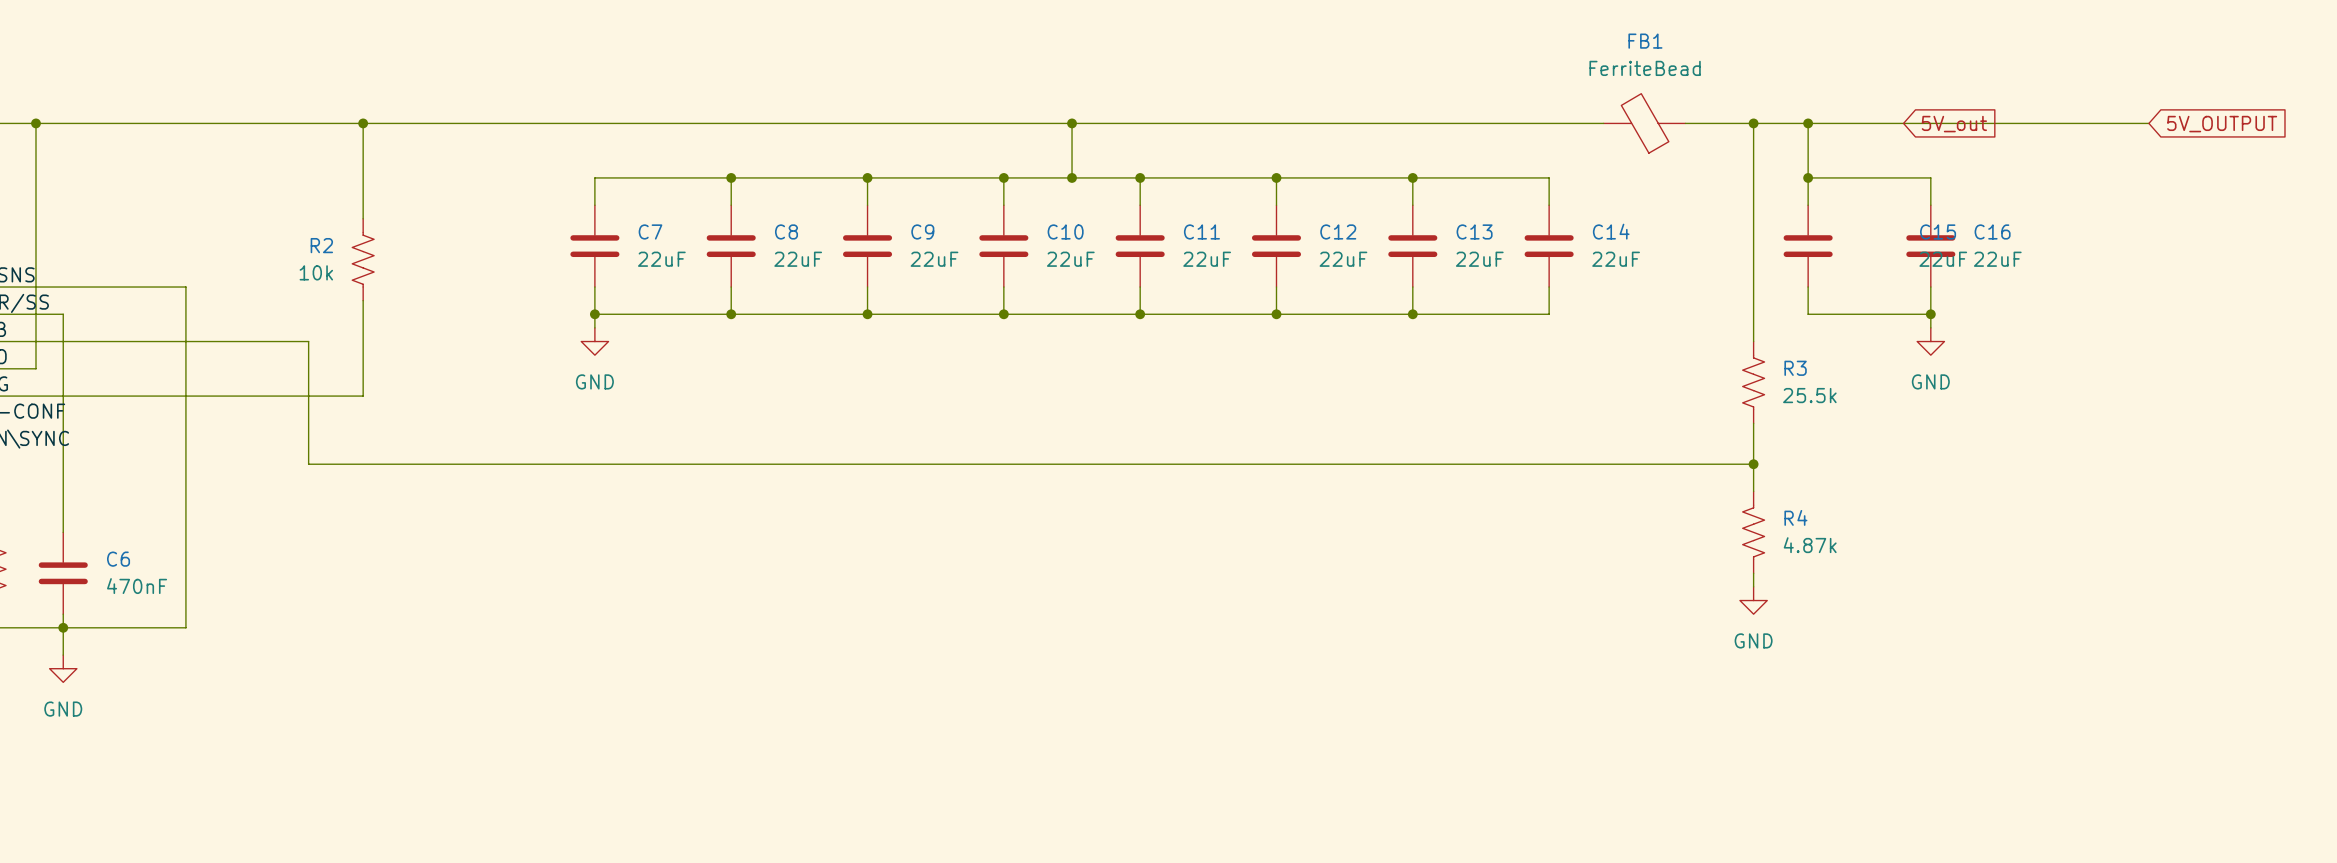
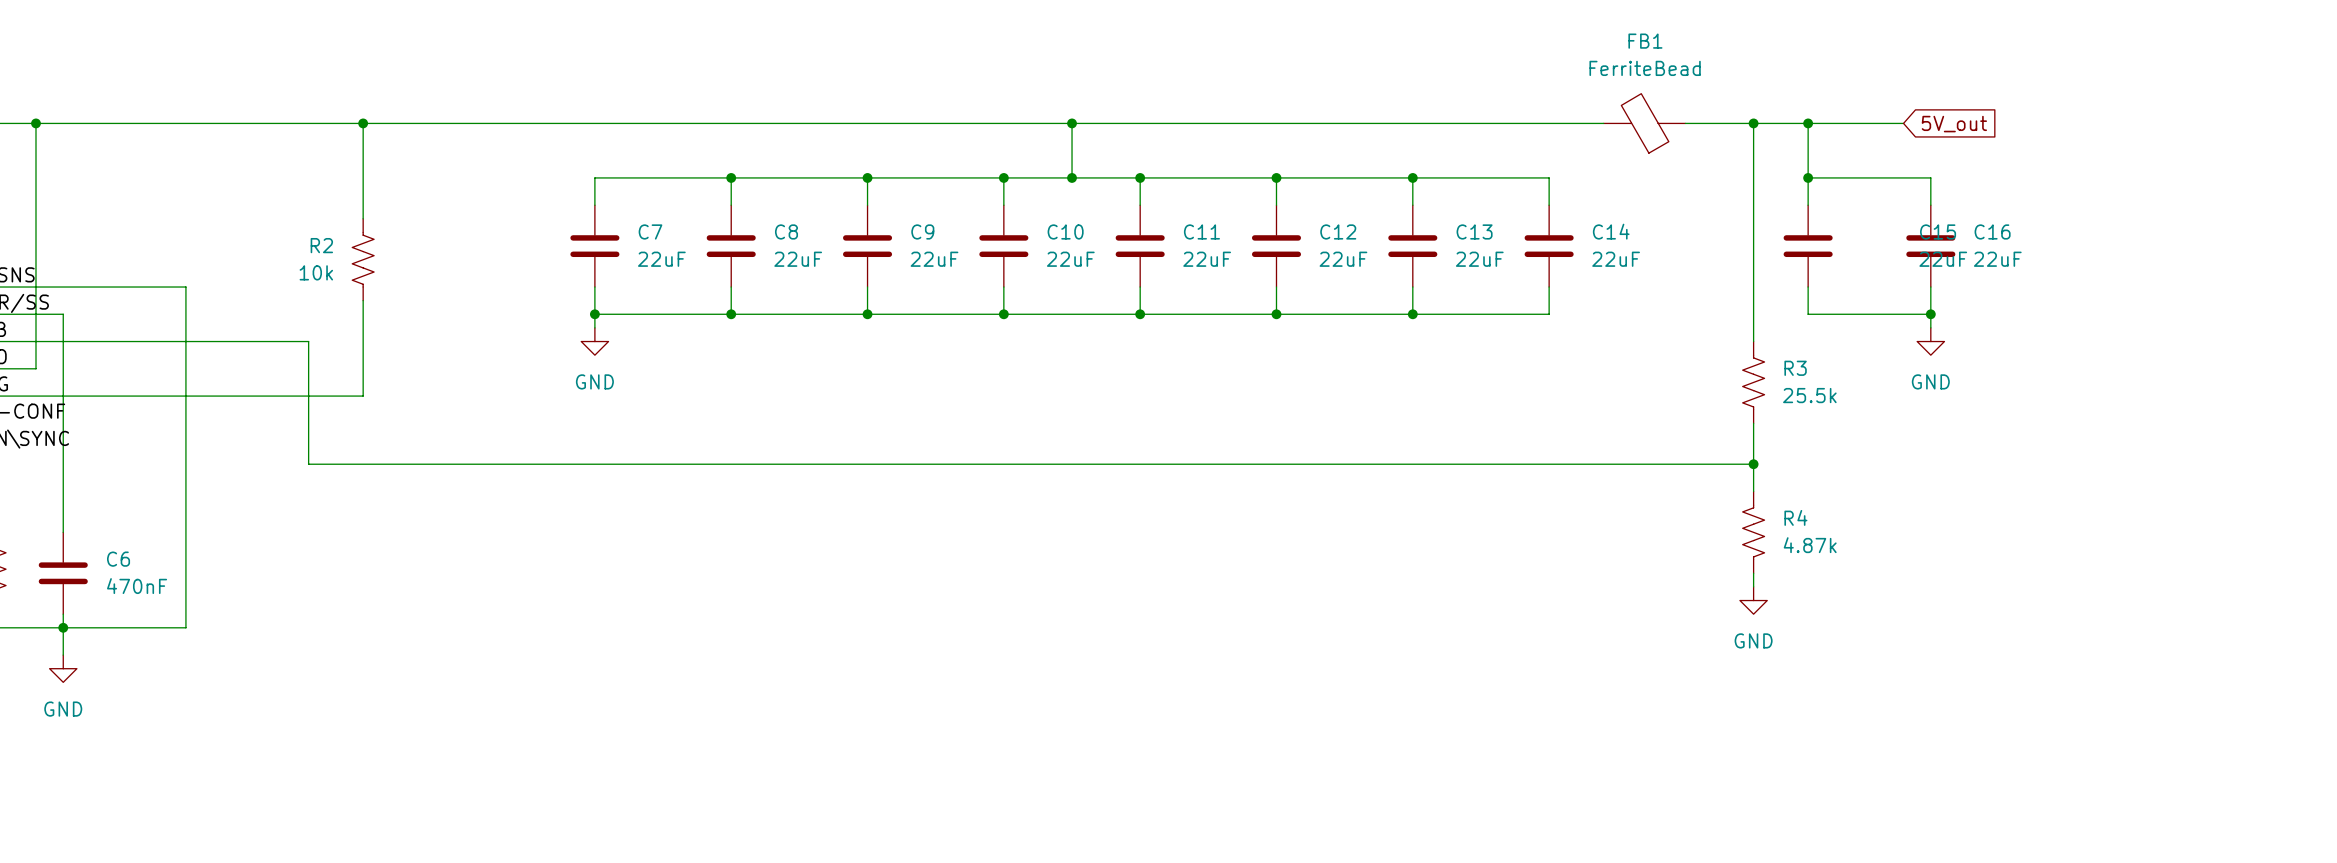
wire: (1903, 123) (2148, 123) -> none
global label: 5V_OUTPUT (2222, 124) -> none

